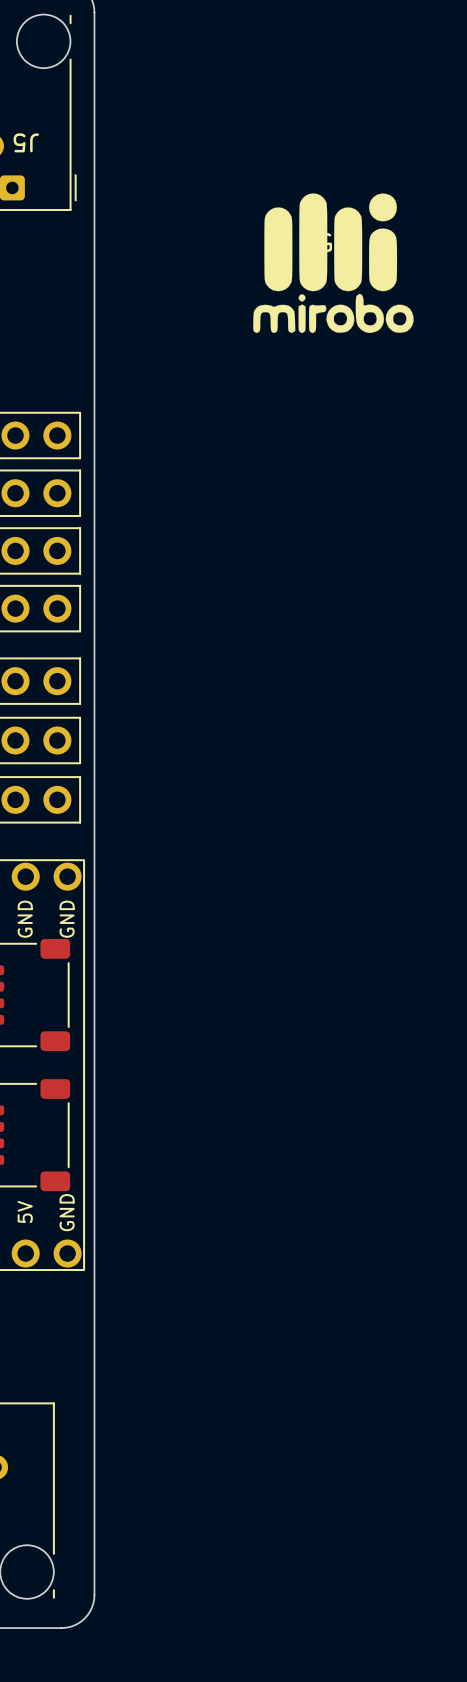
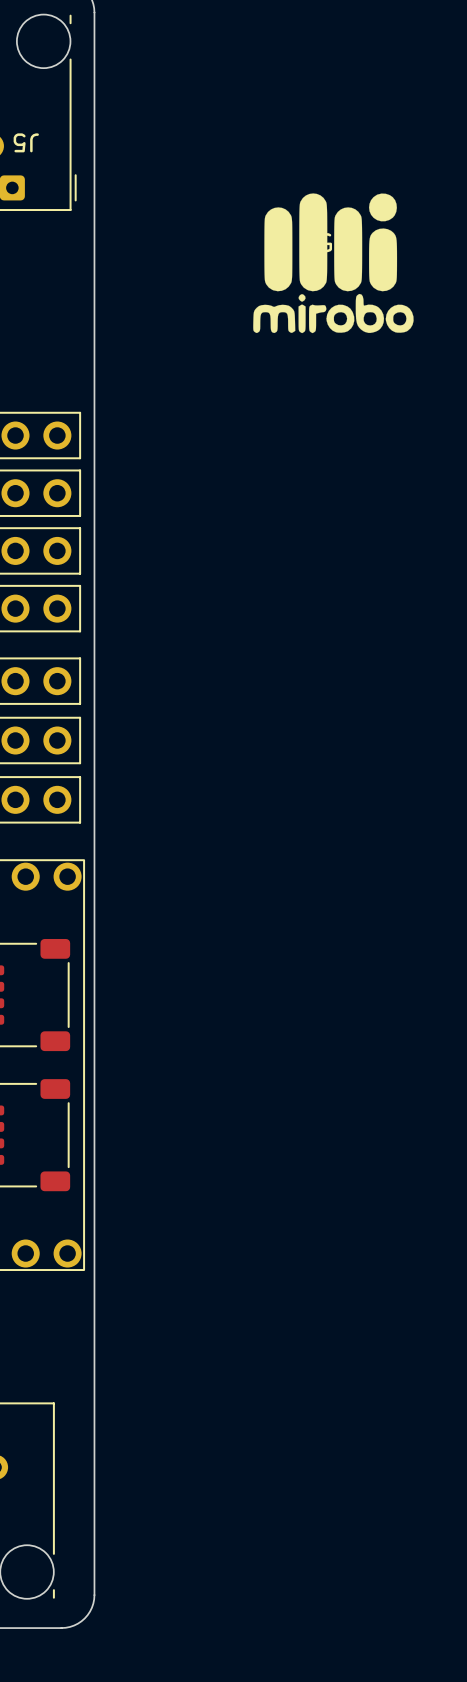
text: GND (25, 919) -> none
text: GND (67, 919) -> none
text: 5V (25, 1212) -> none
text: GND (67, 1212) -> none

